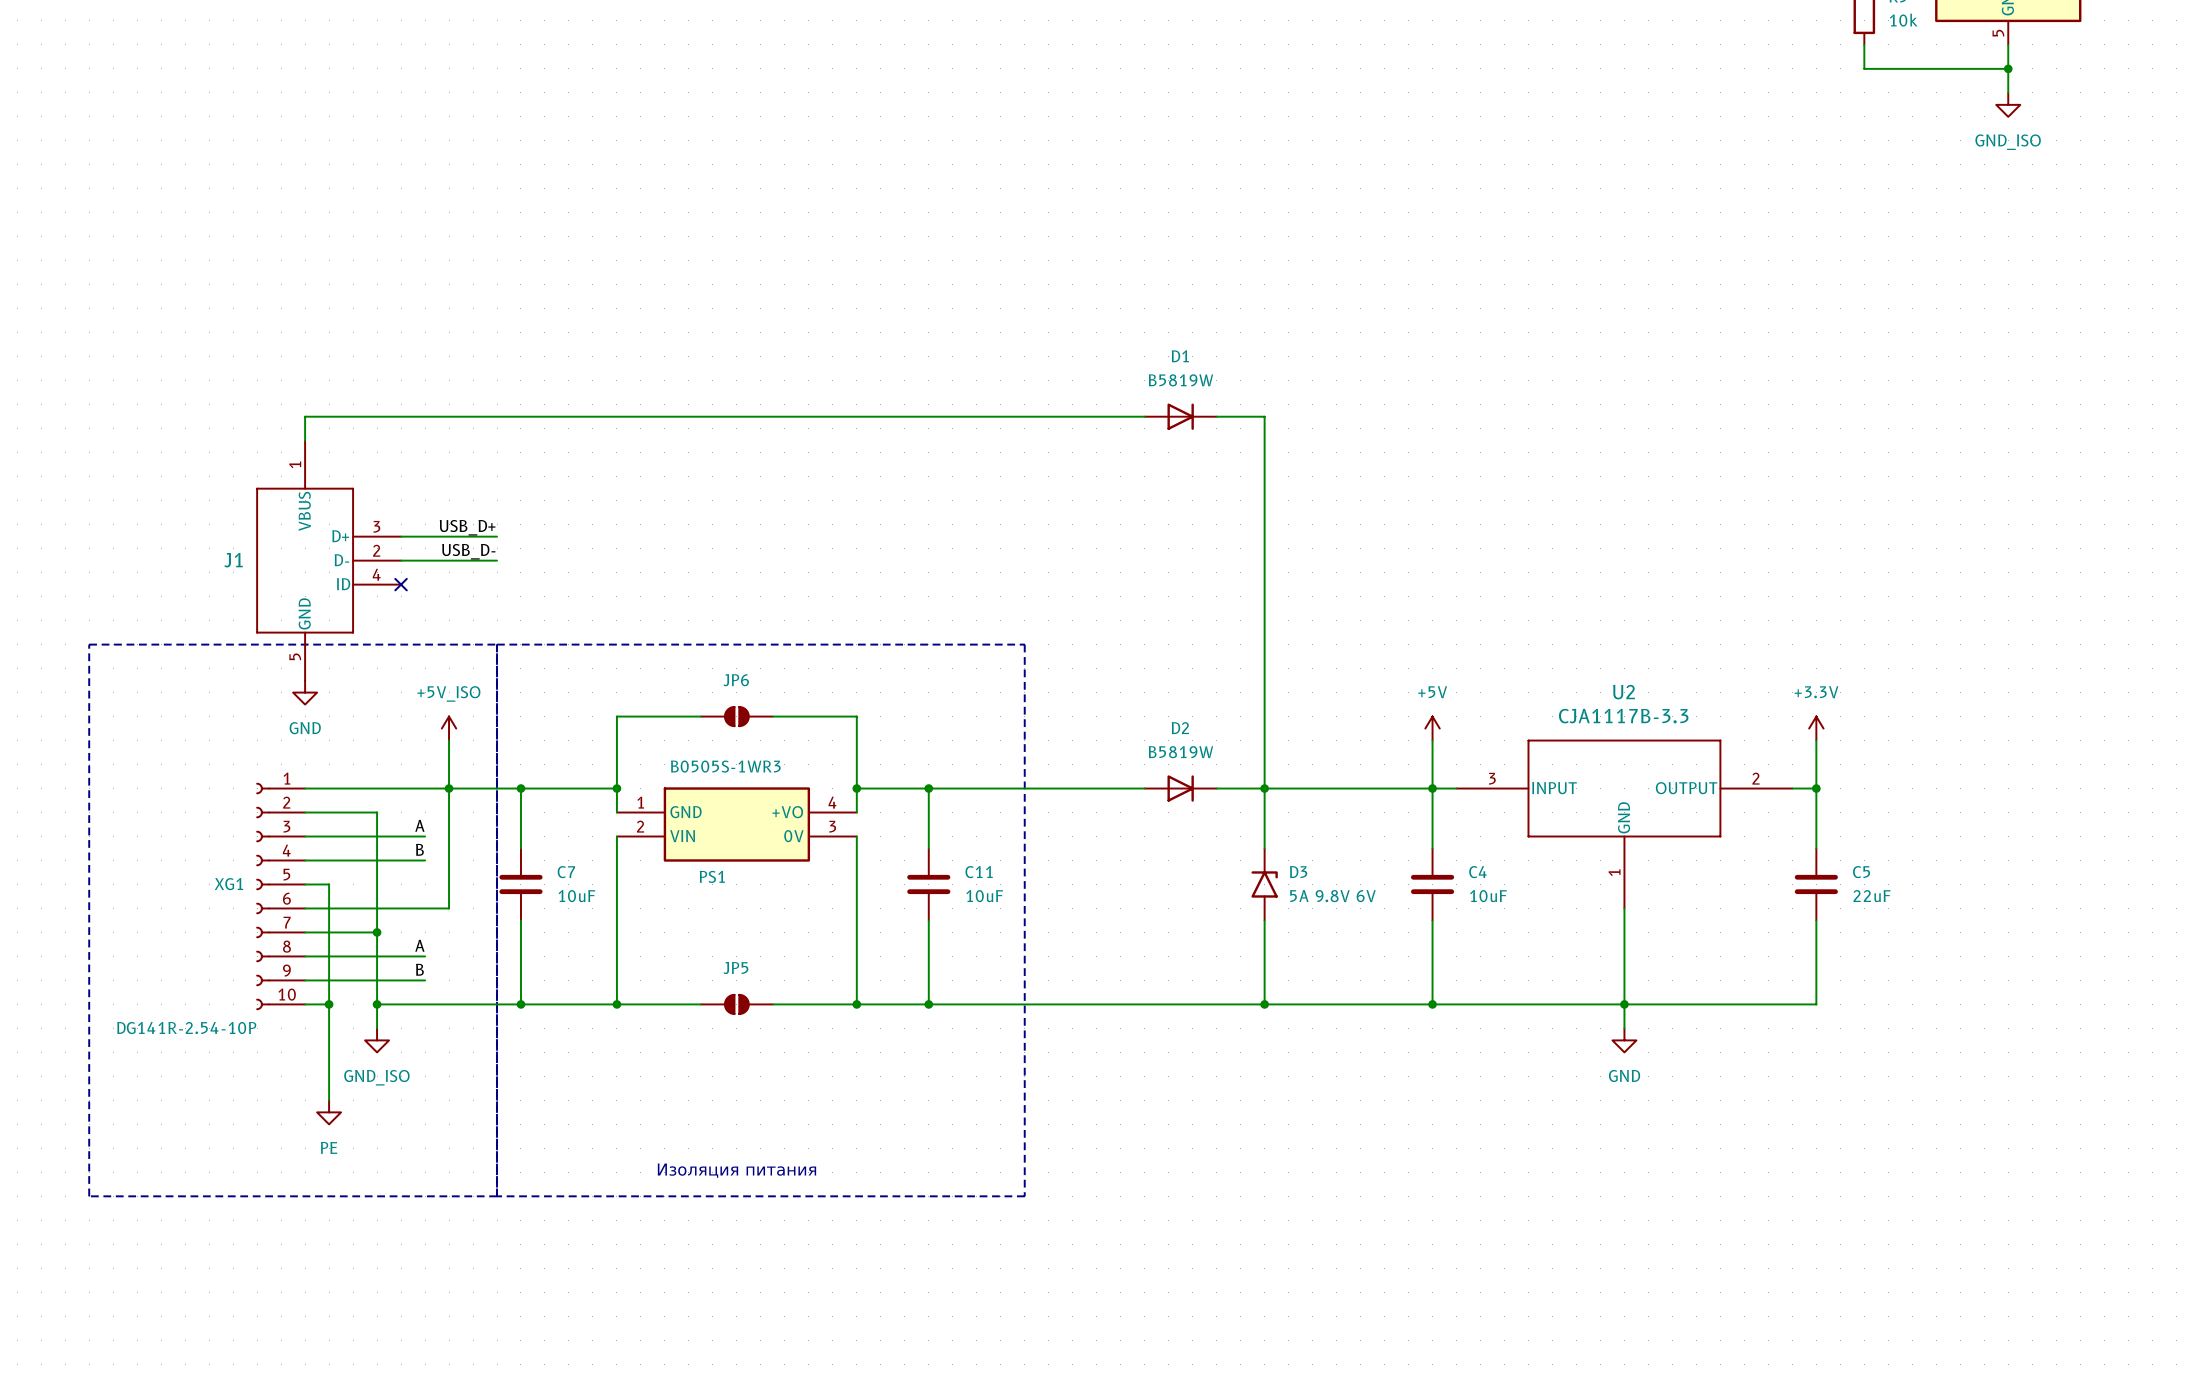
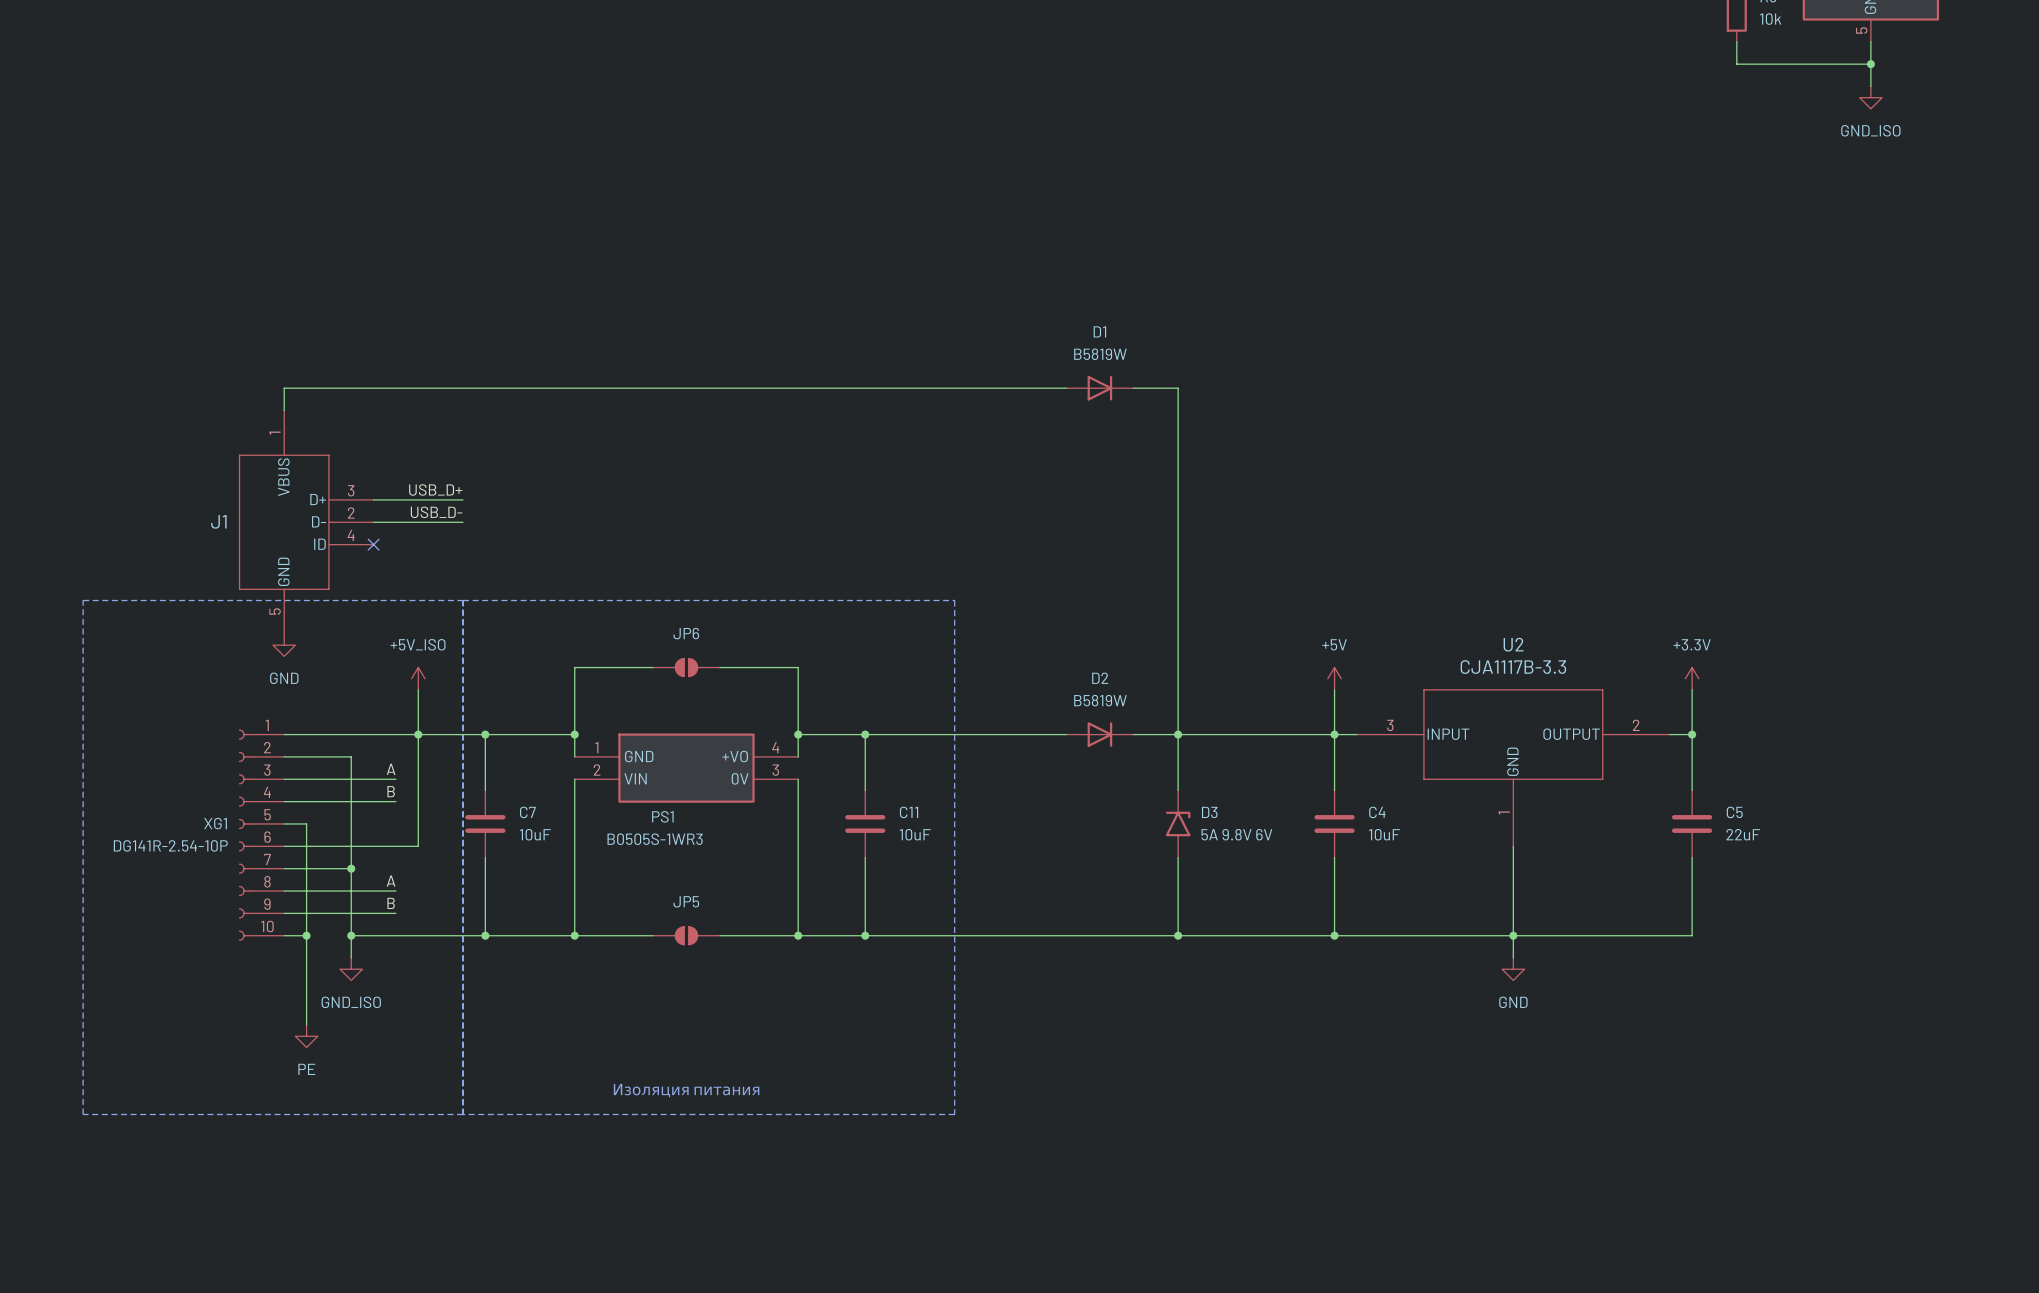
PS1 value position: B0505S-1WR3 (725, 766) -> B0505S-1WR3 (655, 839)
XG1 value position: DG141R-2.54-10P (186, 1028) -> DG141R-2.54-10P (170, 845)

